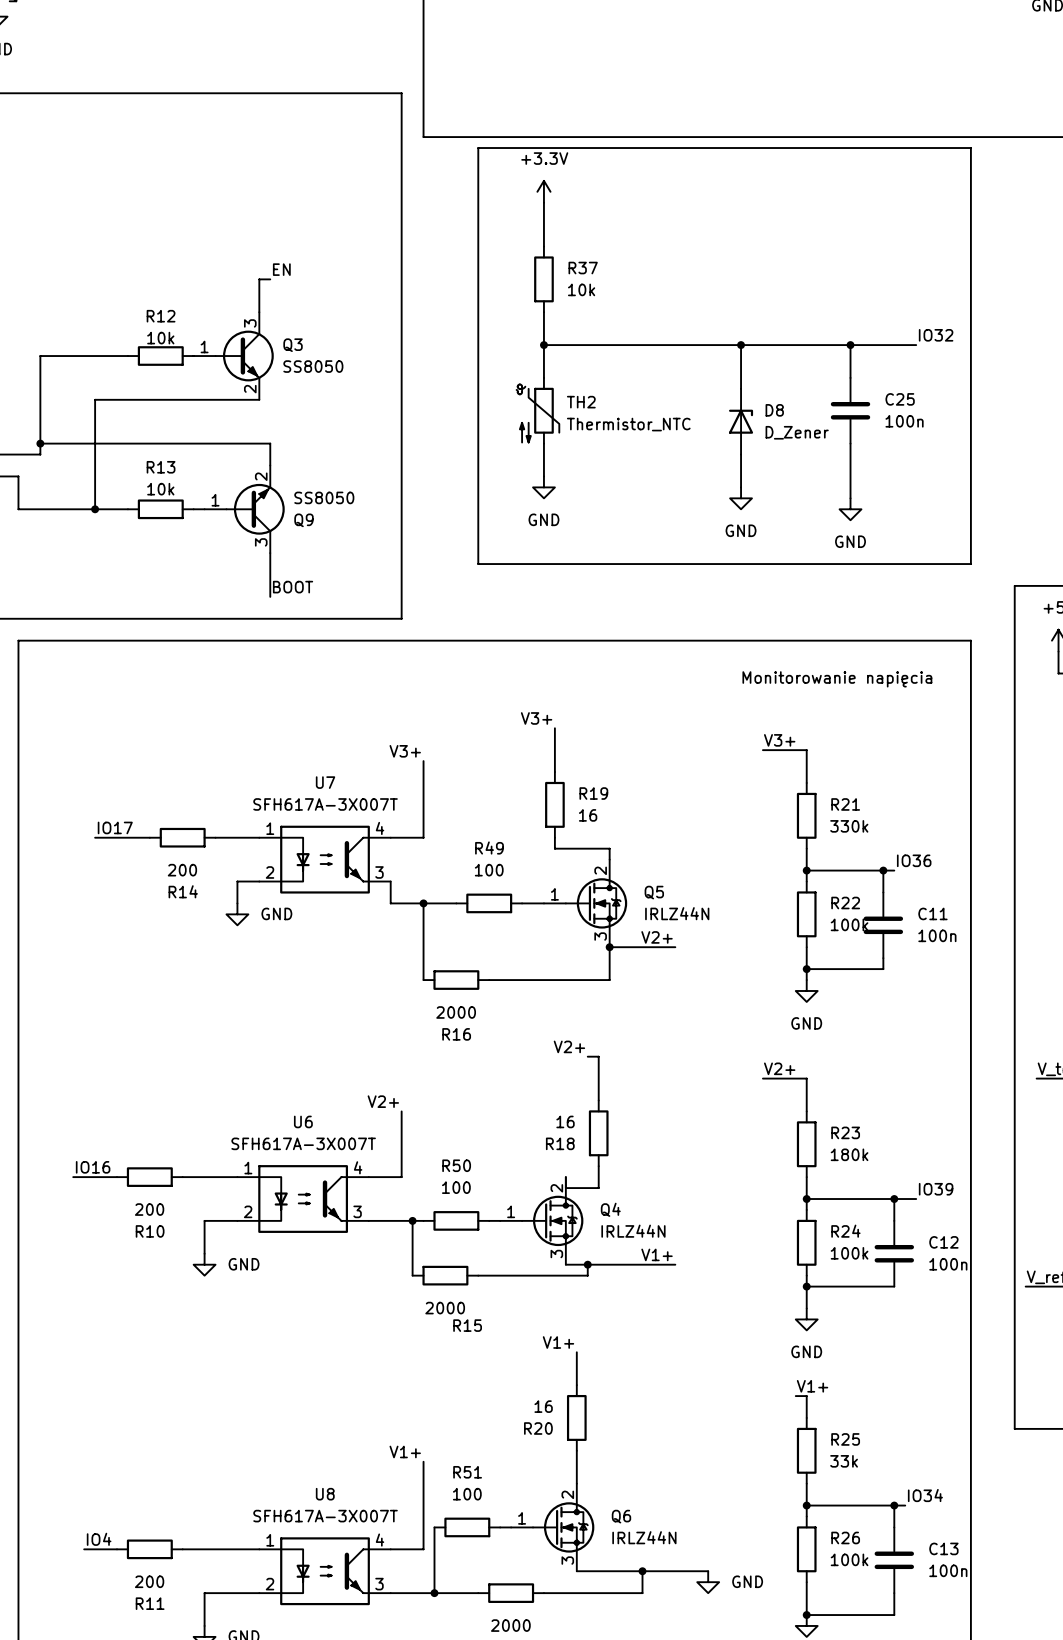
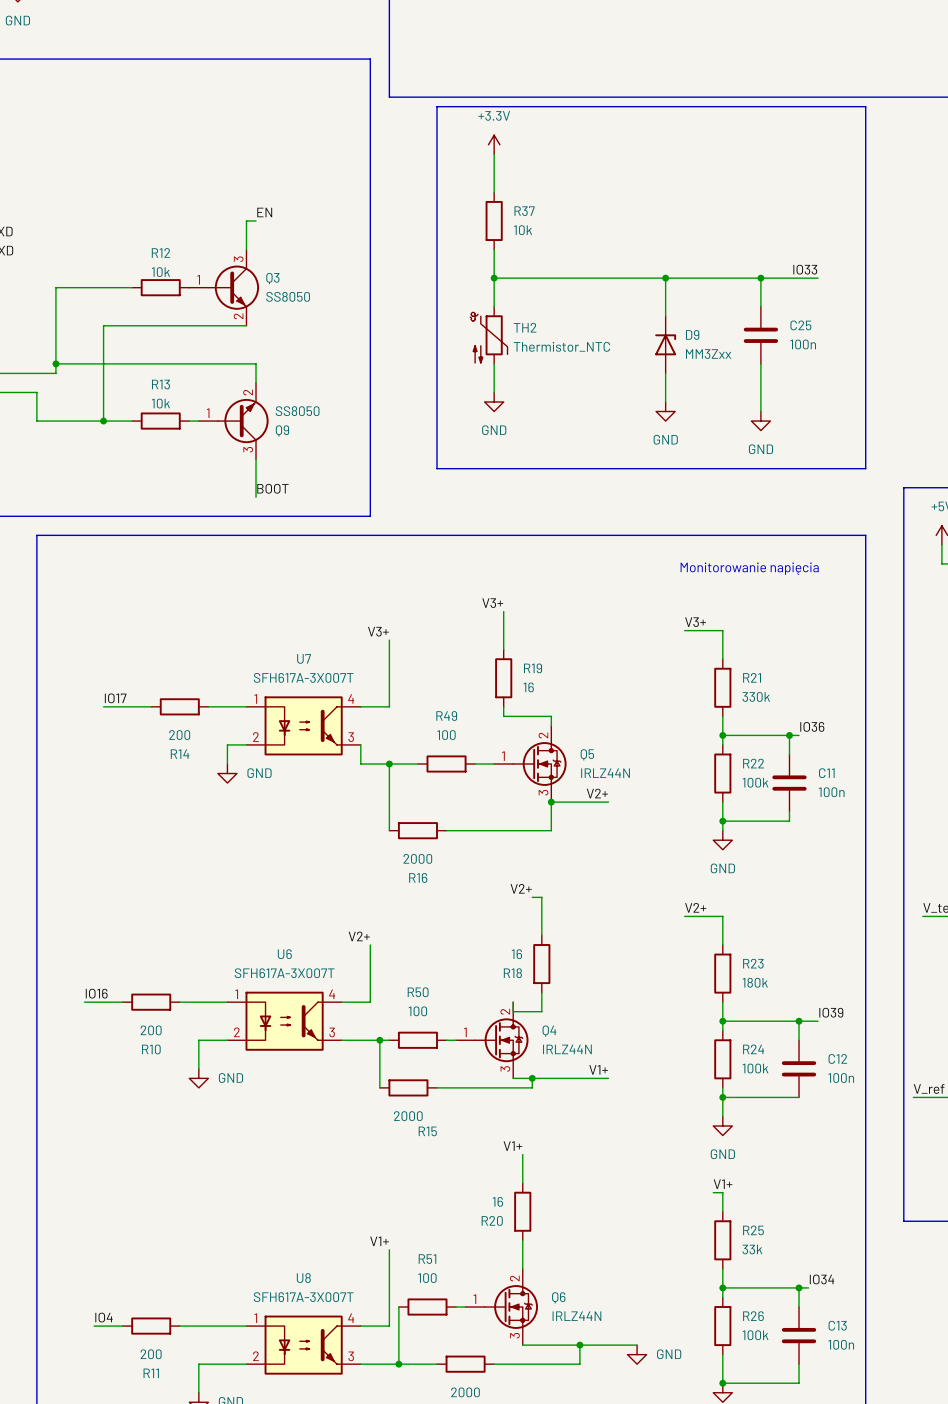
label: IO32 (936, 335) -> IO33 (805, 269)
D8 name: D8 (774, 410) -> D9 (692, 334)
D8 value: D_Zener (797, 432) -> MM3Zxx (708, 354)

